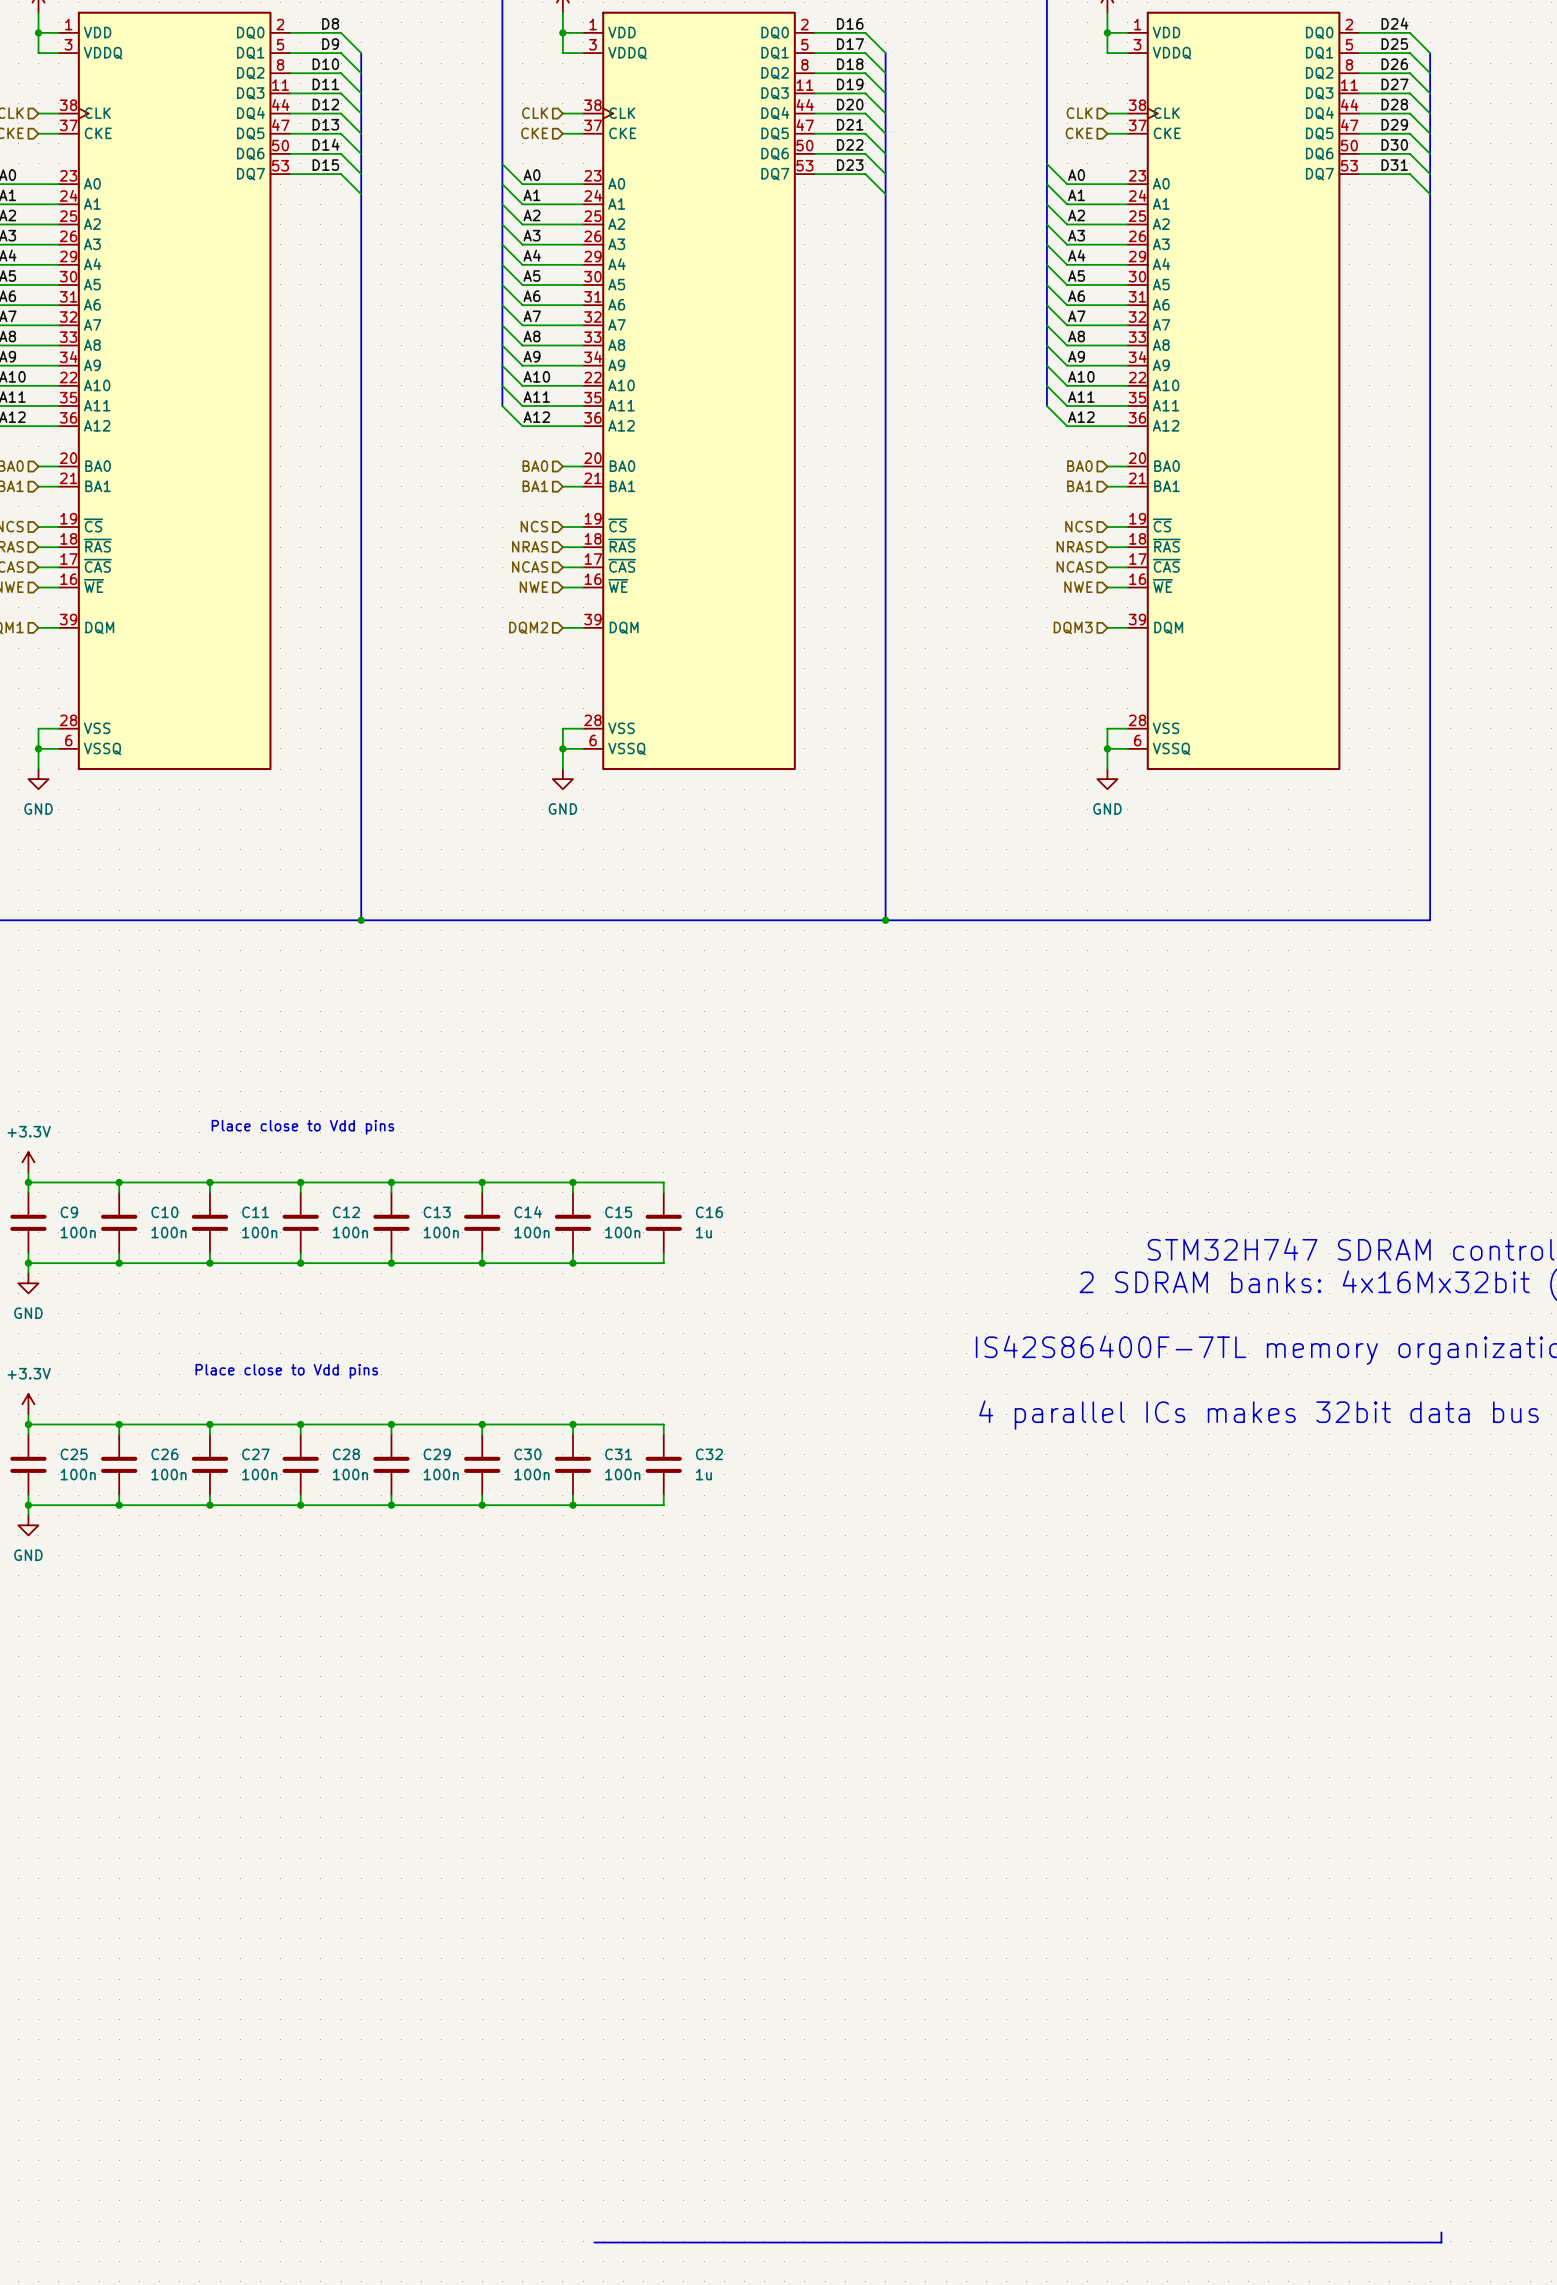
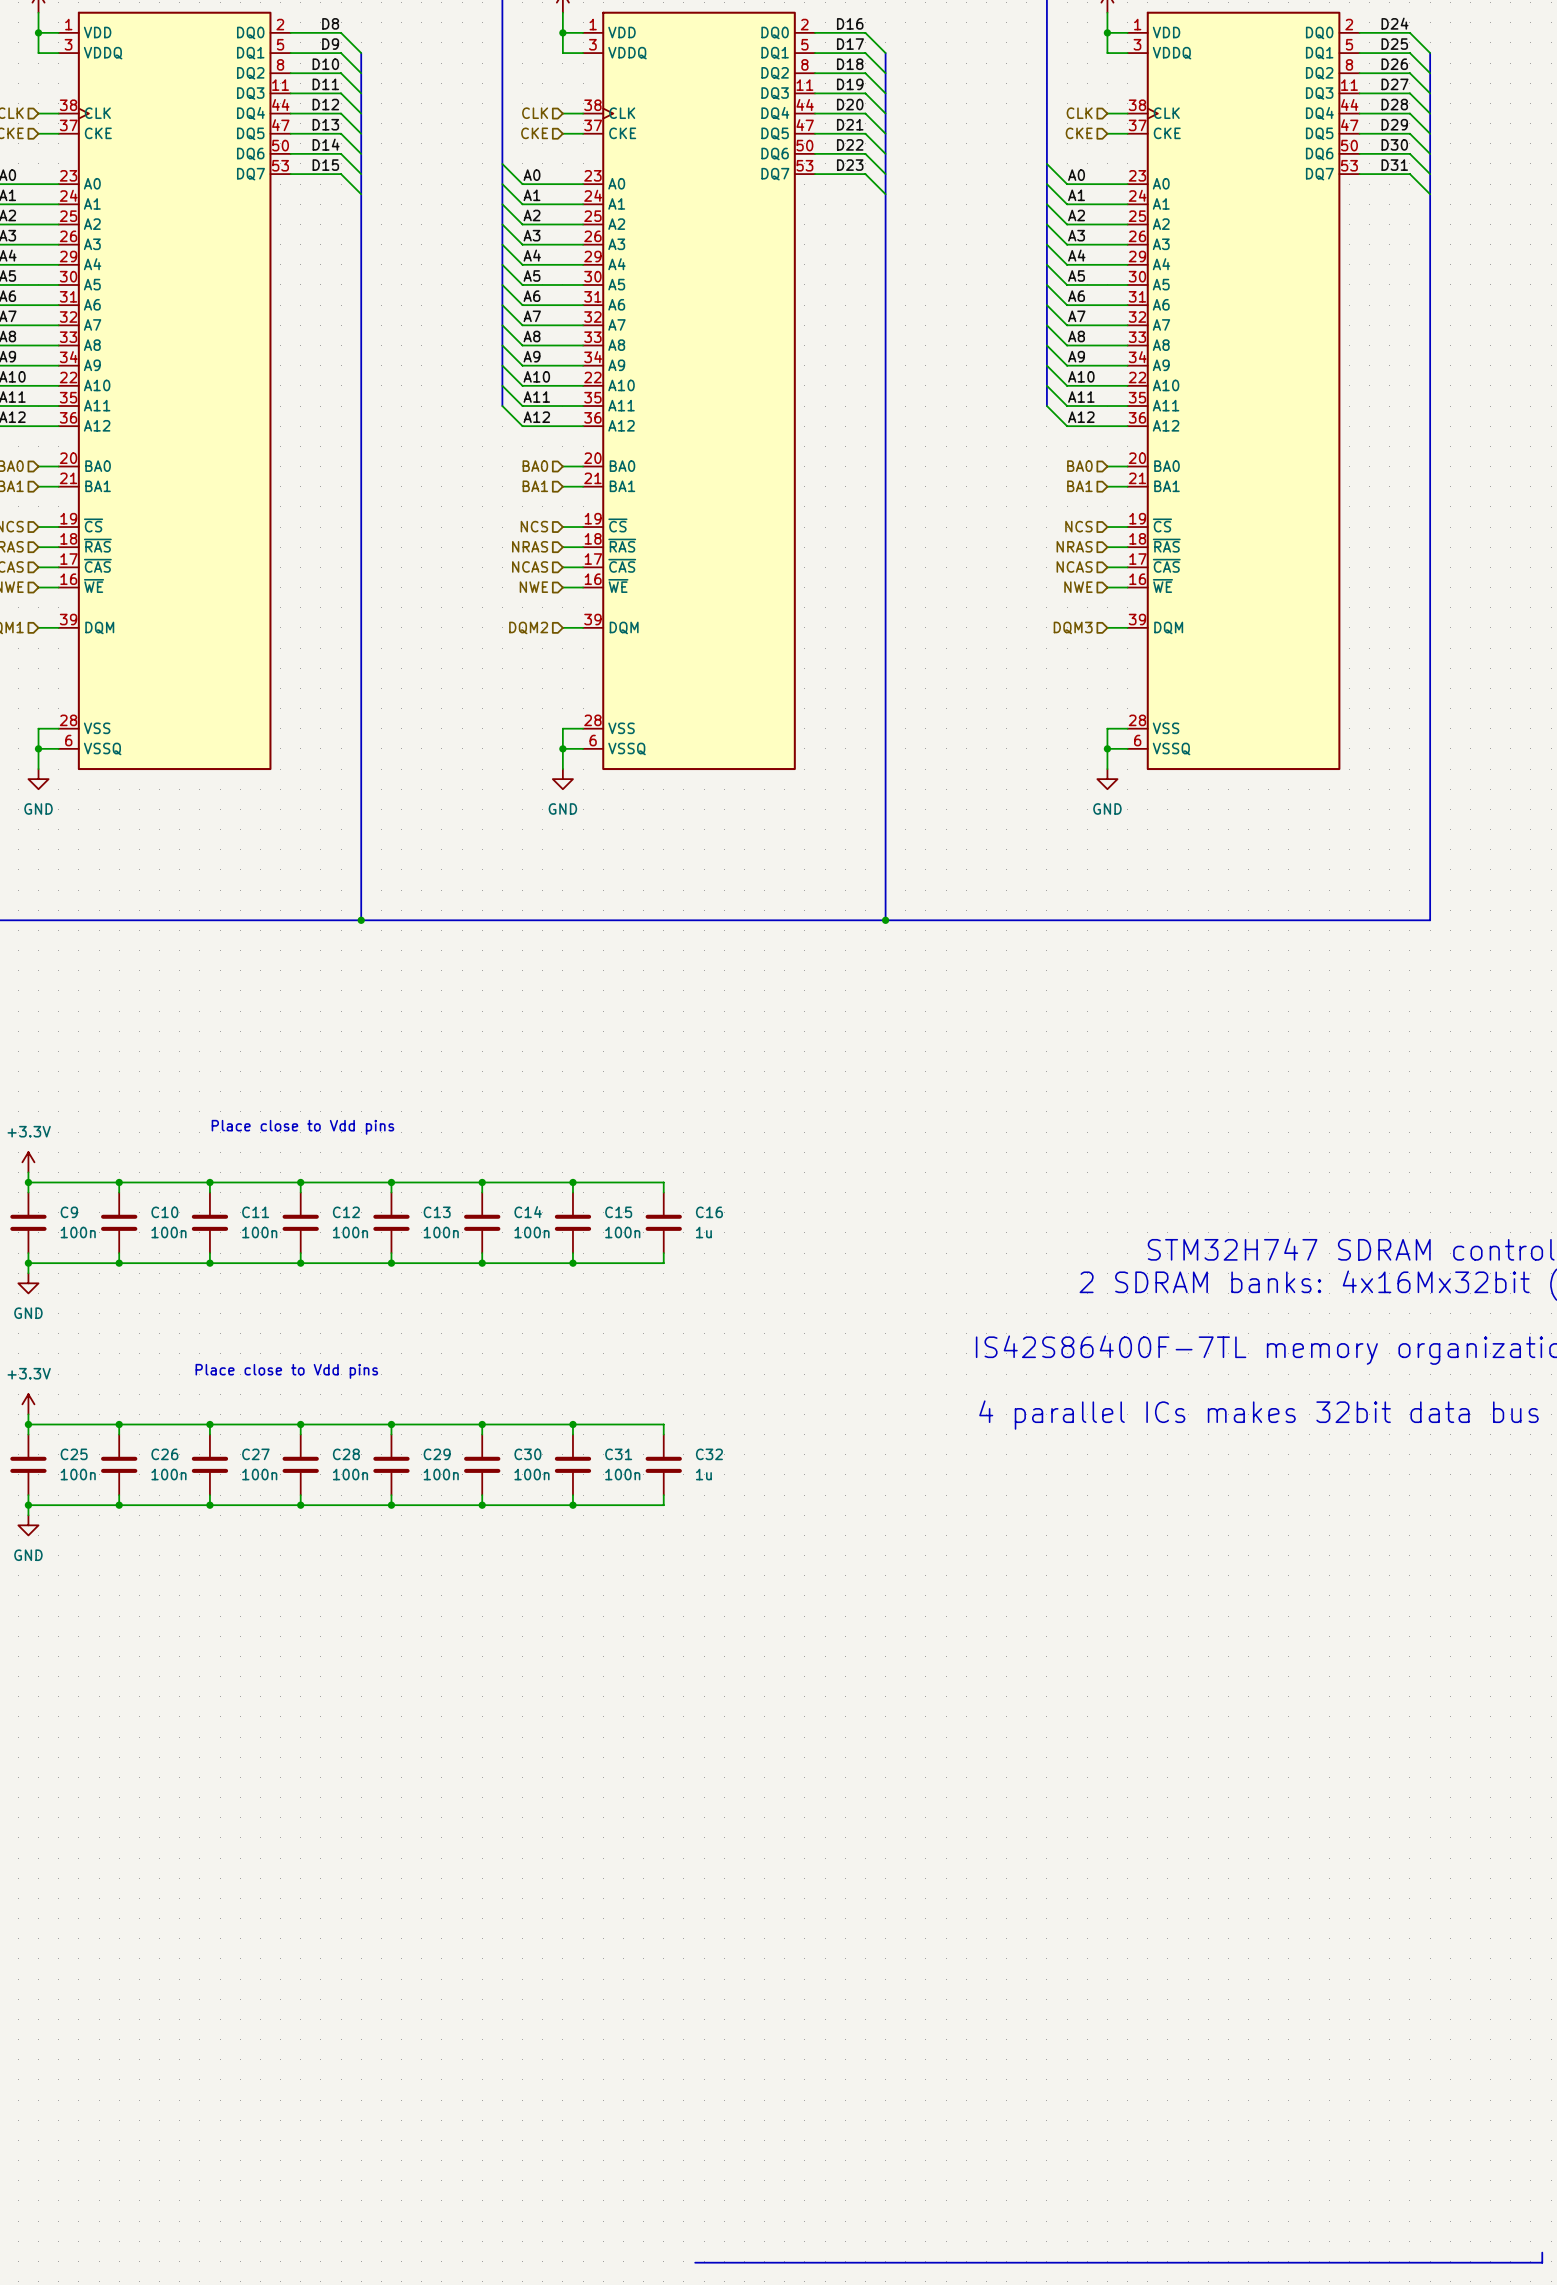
bus: (1441, 2232) (1441, 2242) (594, 2242) -> (1542, 2252) (1542, 2262) (695, 2262)

